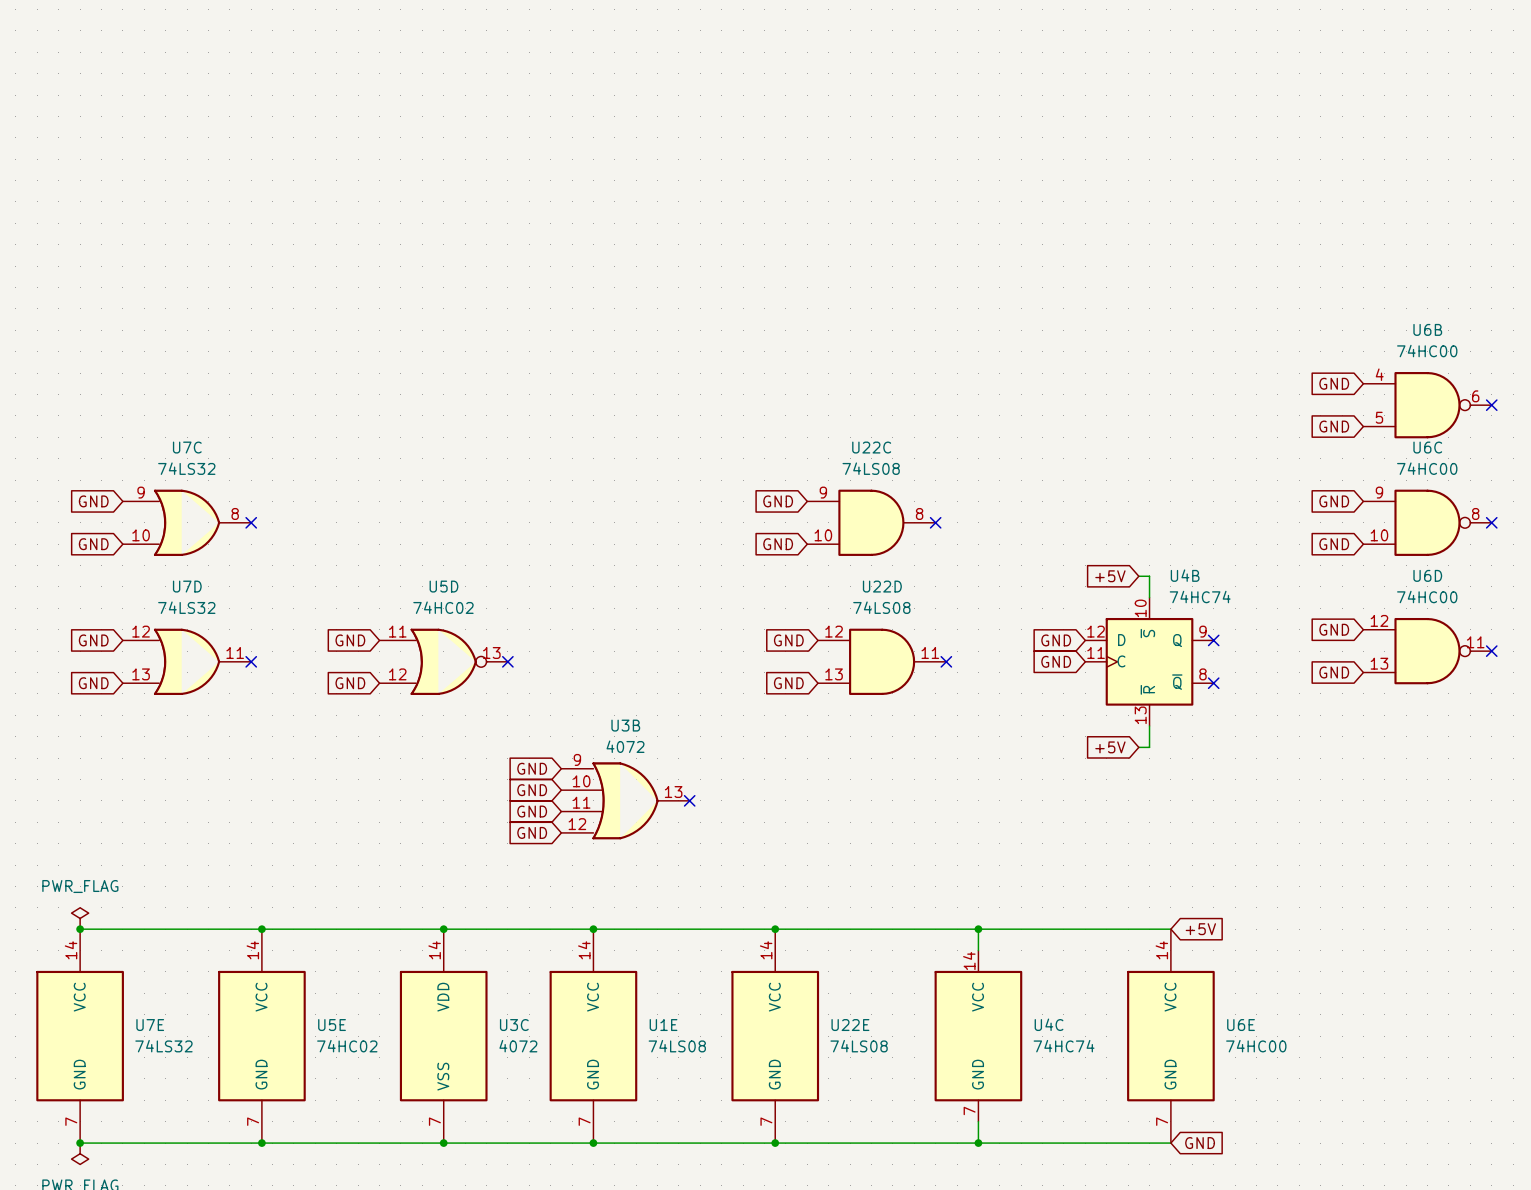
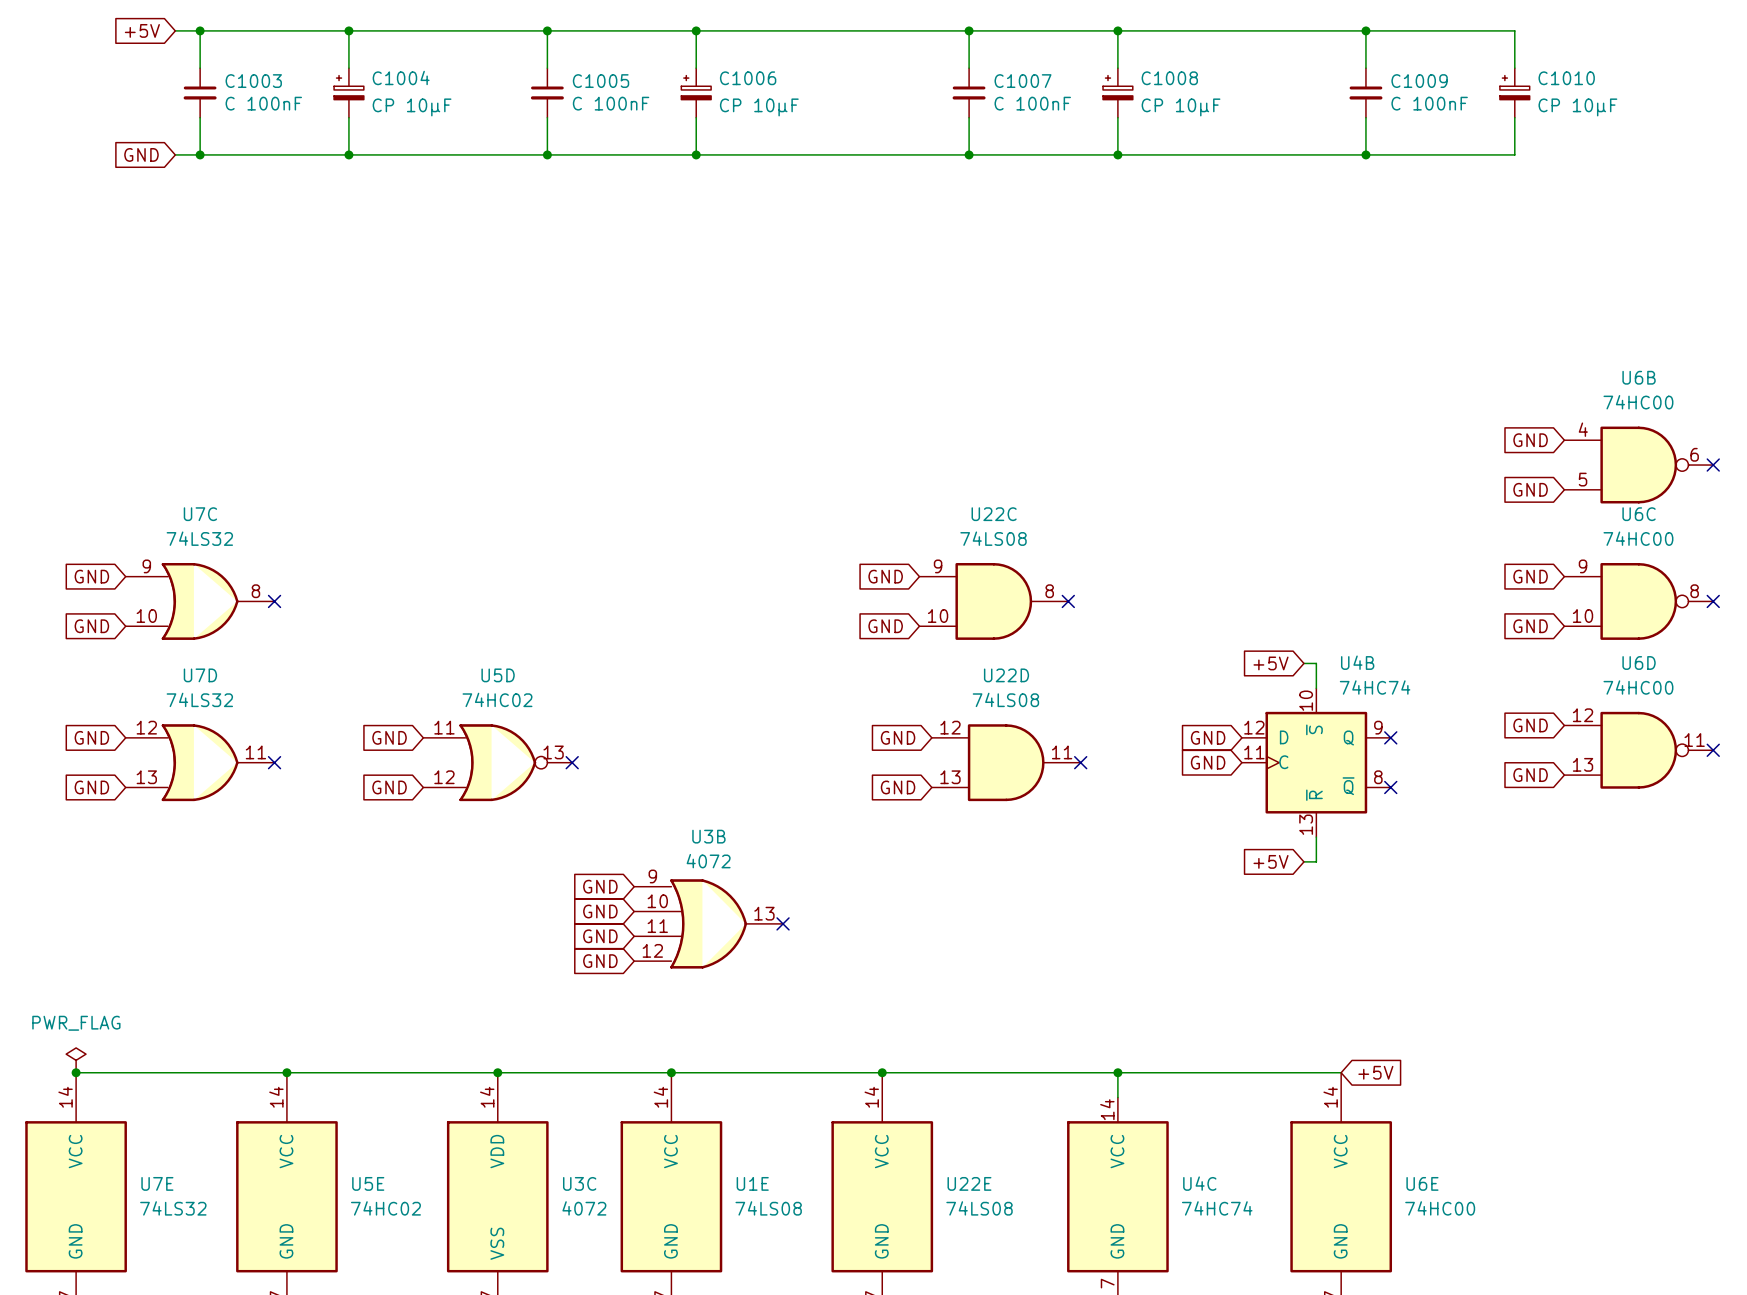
global label: none -> +5V (142, 30)
wire: none -> (175, 30) (1514, 30) (1514, 68)
wire: none -> (200, 30) (200, 68)
junction: none -> (200, 30)
wire: none -> (348, 30) (348, 68)
junction: none -> (348, 30)
wire: none -> (547, 30) (547, 68)
junction: none -> (547, 30)
wire: none -> (696, 30) (696, 68)
junction: none -> (696, 30)
wire: none -> (969, 30) (969, 68)
junction: none -> (969, 30)
wire: none -> (1117, 30) (1117, 68)
junction: none -> (1117, 30)
wire: none -> (1365, 30) (1365, 68)
junction: none -> (1365, 30)
C1003: none -> C 100nF (200, 92)
C1004: none -> CP 10μF (348, 92)
C1005: none -> C 100nF (547, 92)
C1006: none -> CP 10μF (696, 92)
C1007: none -> C 100nF (969, 92)
C1008: none -> CP 10μF (1117, 92)
C1009: none -> C 100nF (1365, 92)
C1010: none -> CP 10μF (1514, 92)
wire: none -> (200, 117) (200, 154)
wire: none -> (348, 117) (348, 154)
wire: none -> (547, 117) (547, 154)
wire: none -> (696, 117) (696, 154)
wire: none -> (969, 117) (969, 154)
wire: none -> (1117, 117) (1117, 154)
wire: none -> (1365, 117) (1365, 154)
wire: none -> (1514, 117) (1514, 154) (175, 154)
global label: none -> GND (141, 154)
junction: none -> (200, 154)
junction: none -> (348, 154)
junction: none -> (547, 154)
junction: none -> (696, 154)
junction: none -> (969, 154)
junction: none -> (1117, 154)
junction: none -> (1365, 154)

